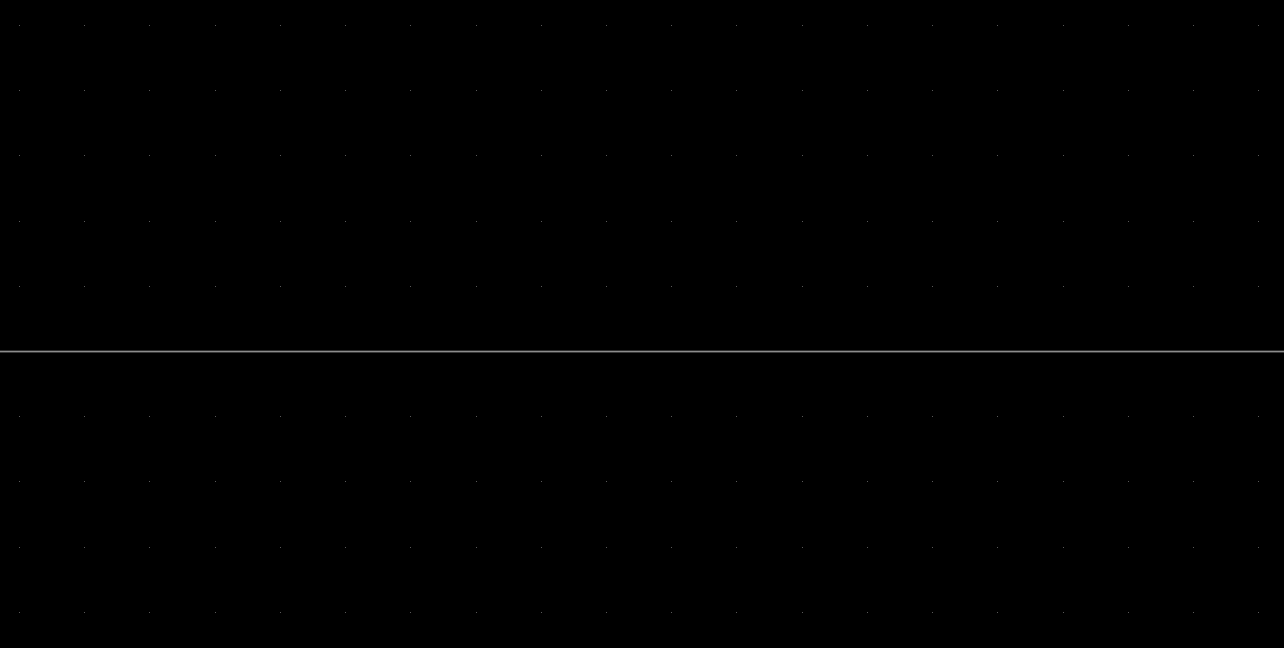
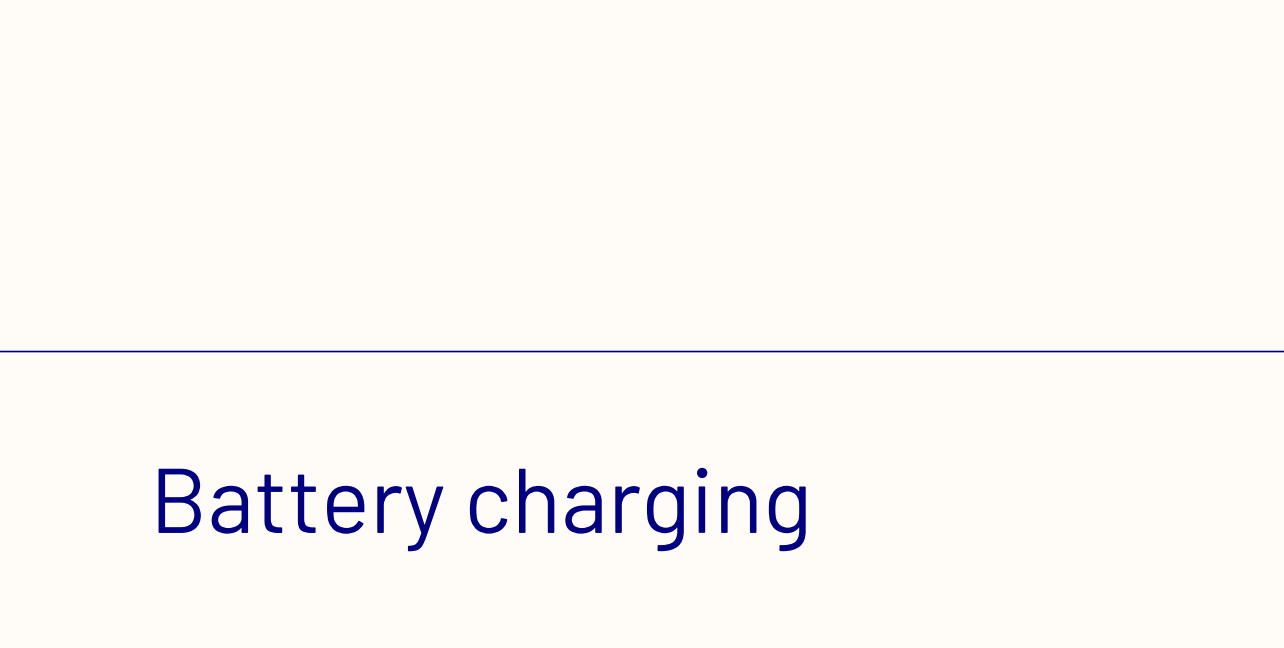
text: none -> Battery charging (482, 509)

